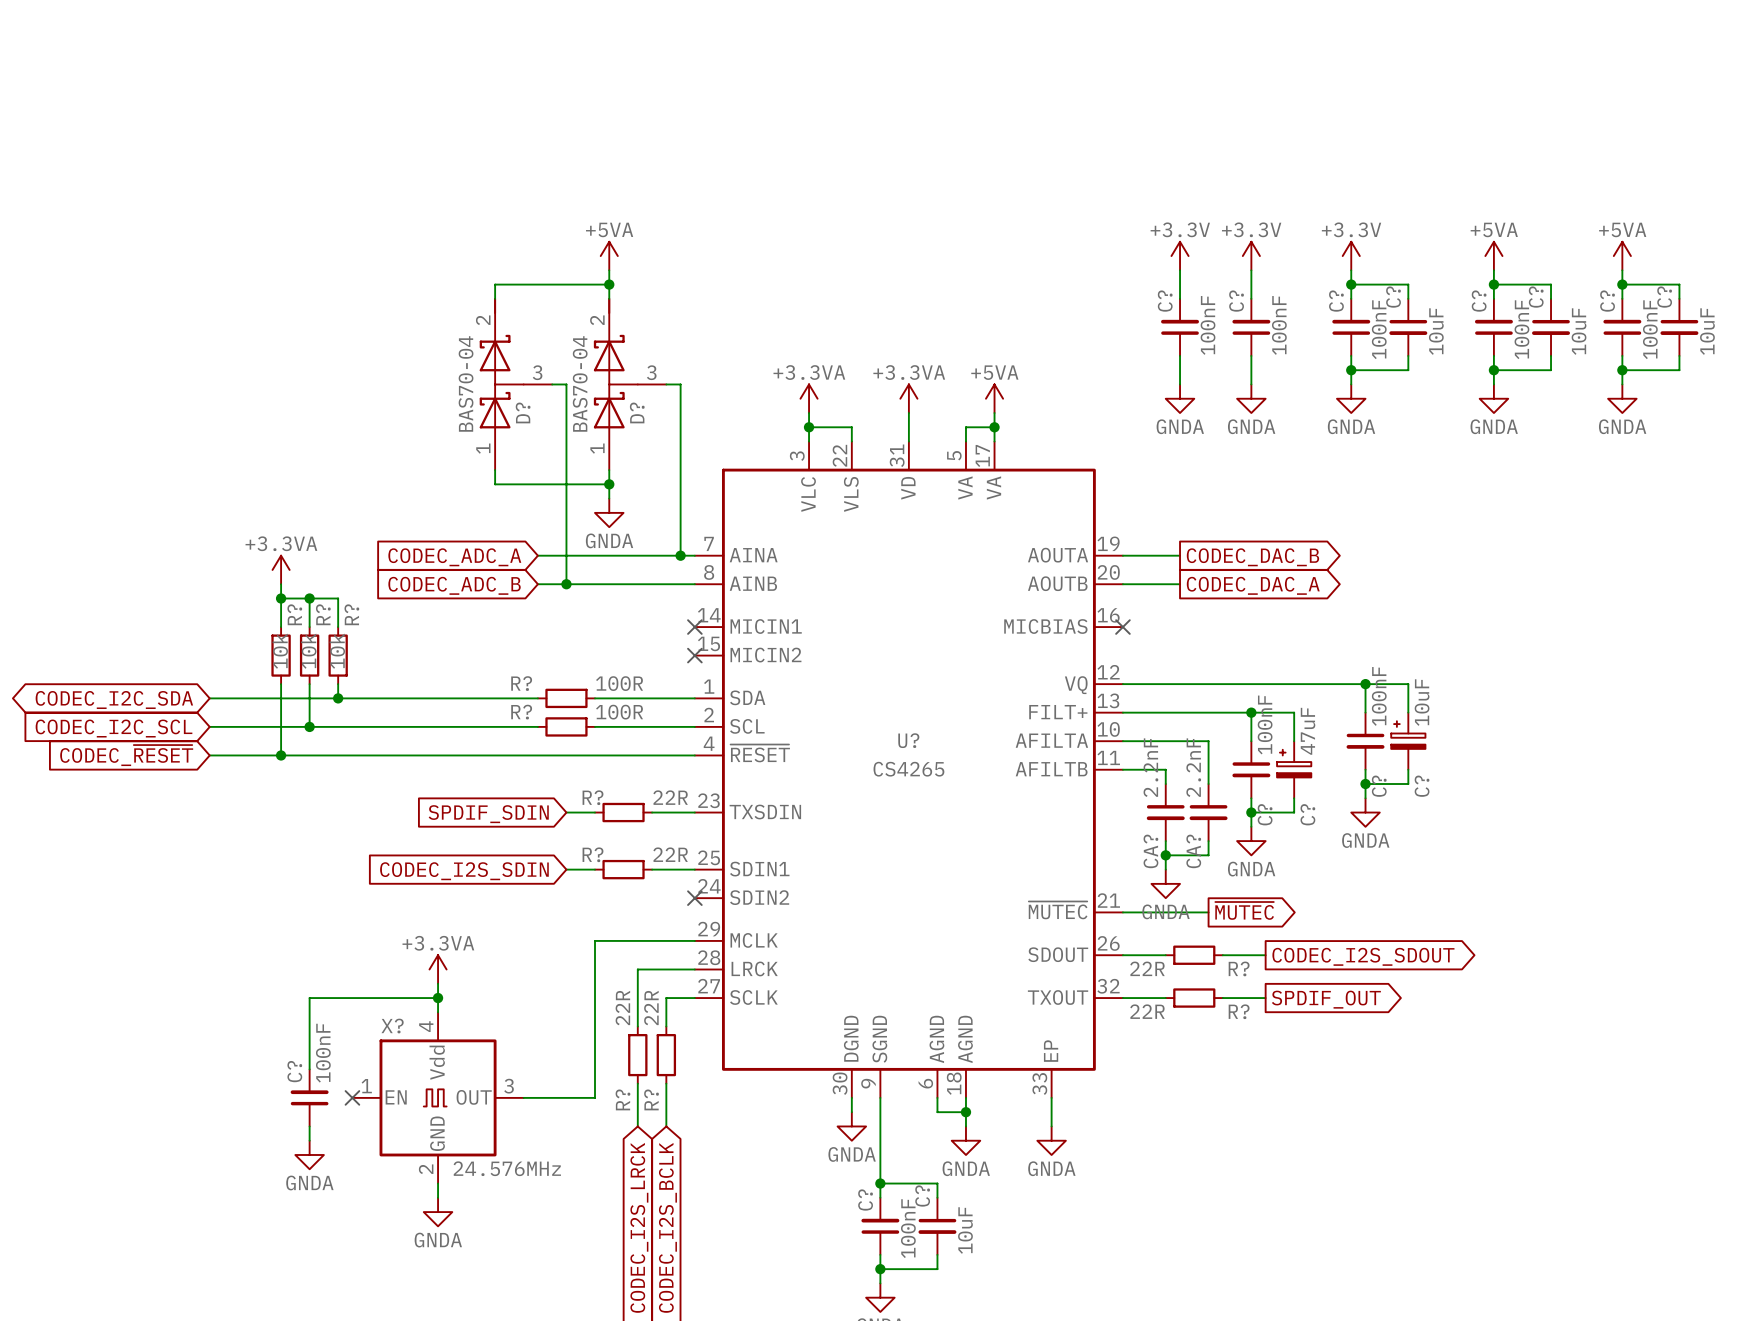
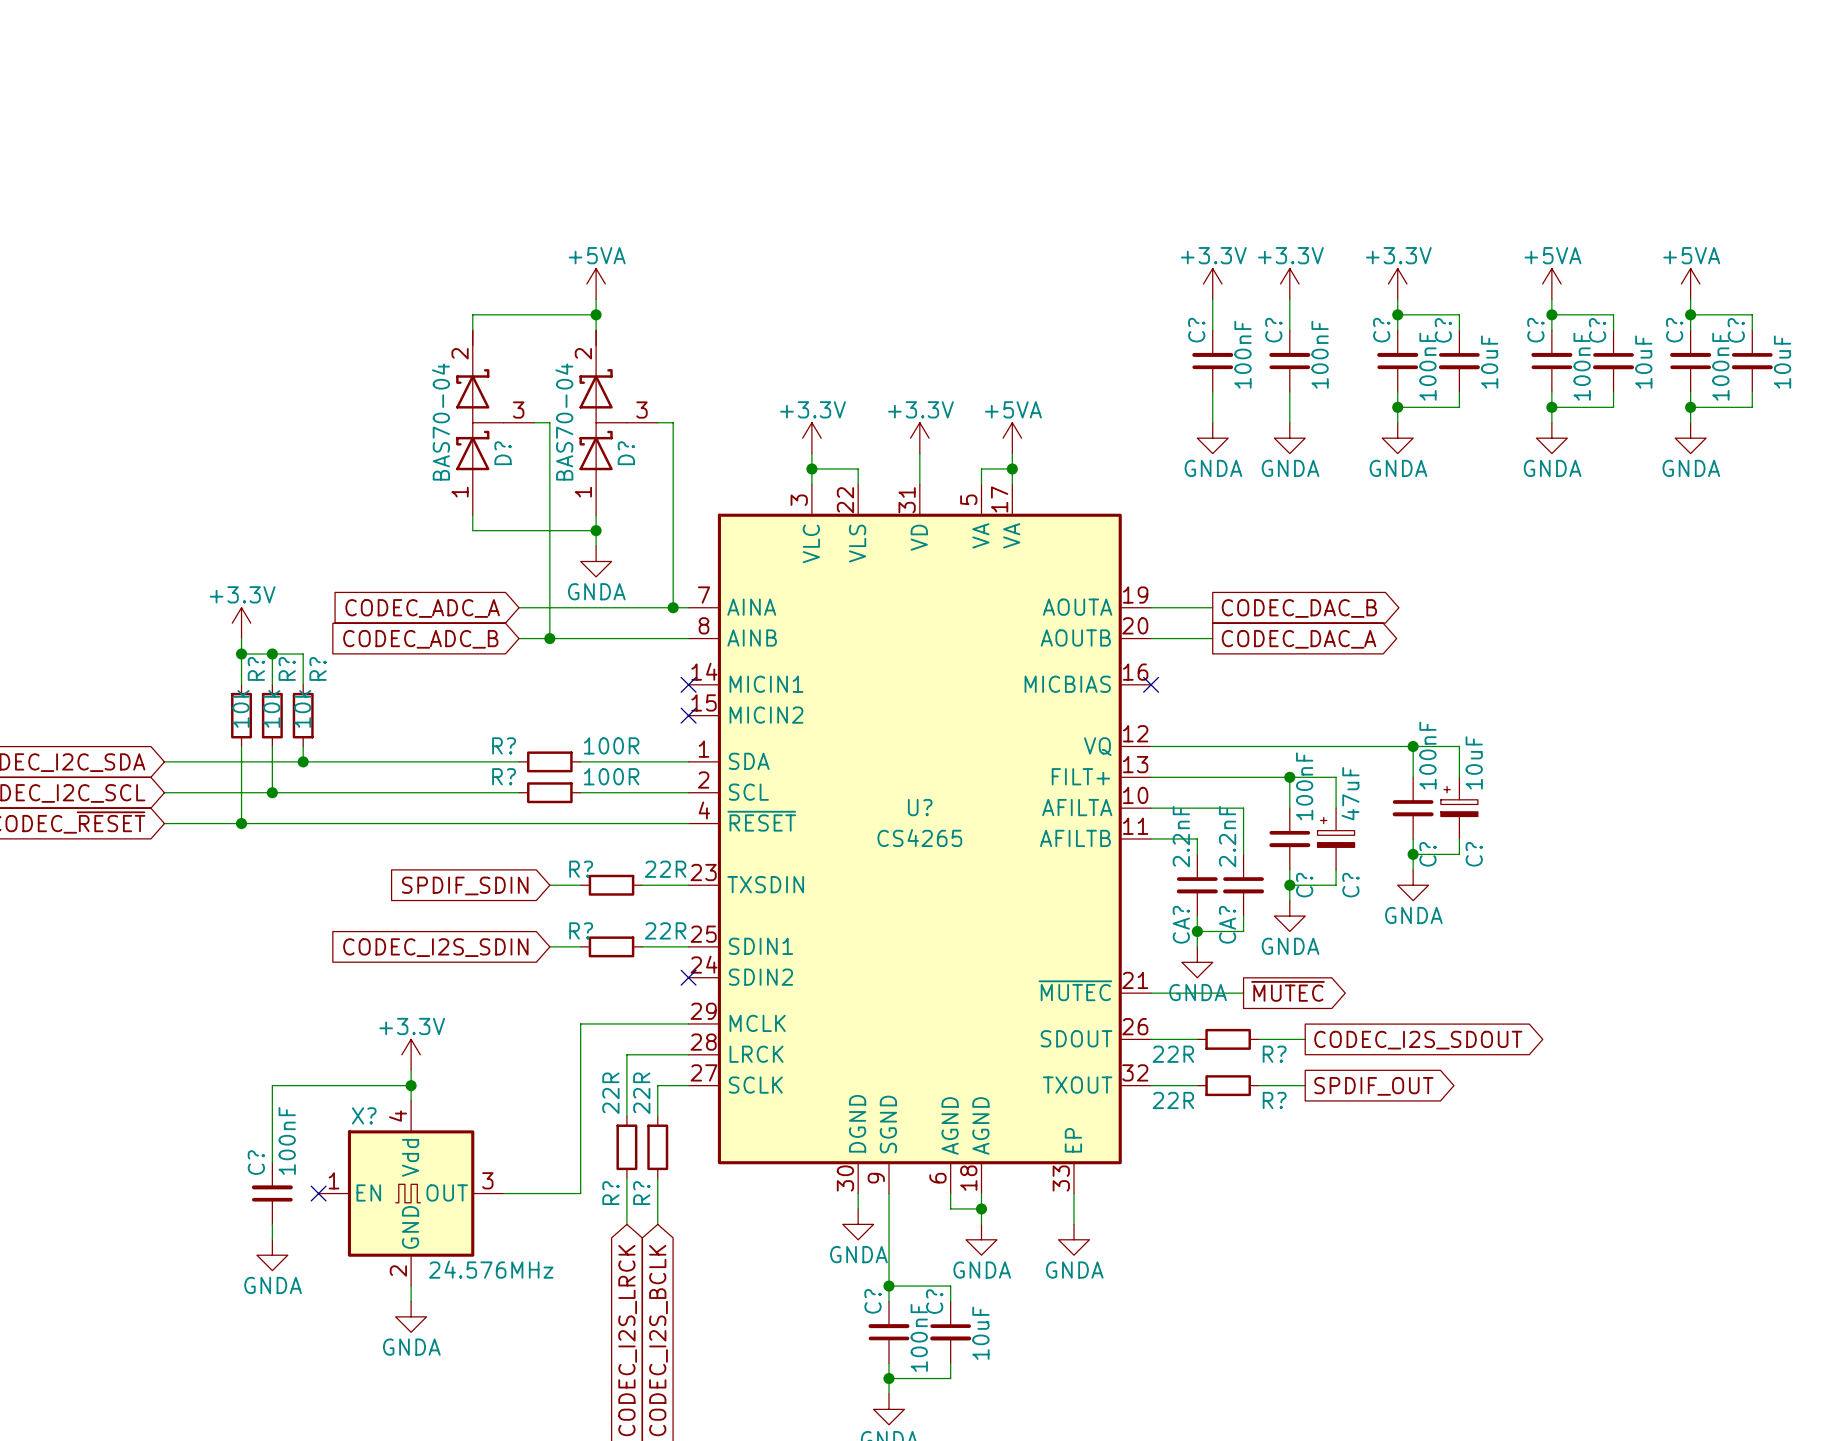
power symbol: +3.3VA (809, 398) -> +3.3V (811, 438)
power symbol: +3.3VA (908, 398) -> +3.3V (919, 438)
power symbol: +3.3VA (281, 569) -> +3.3V (241, 623)
power symbol: +3.3VA (438, 969) -> +3.3V (411, 1054)

